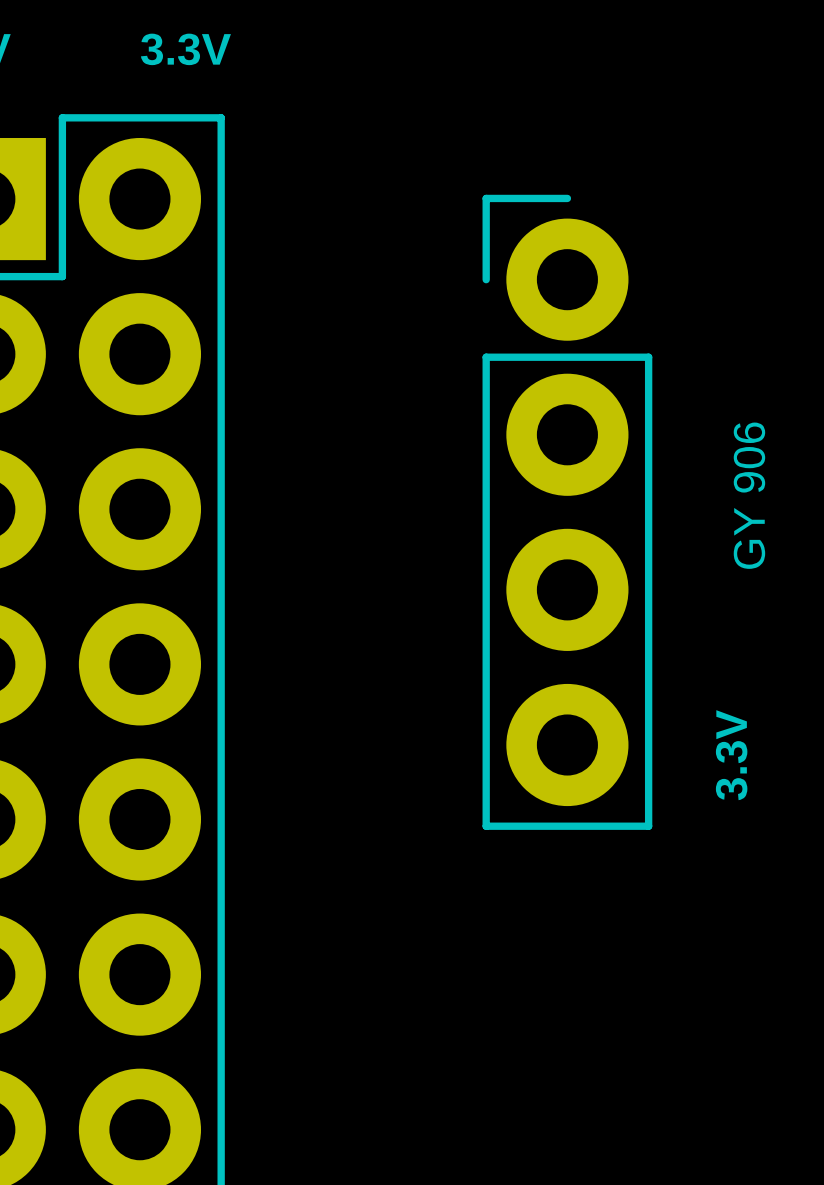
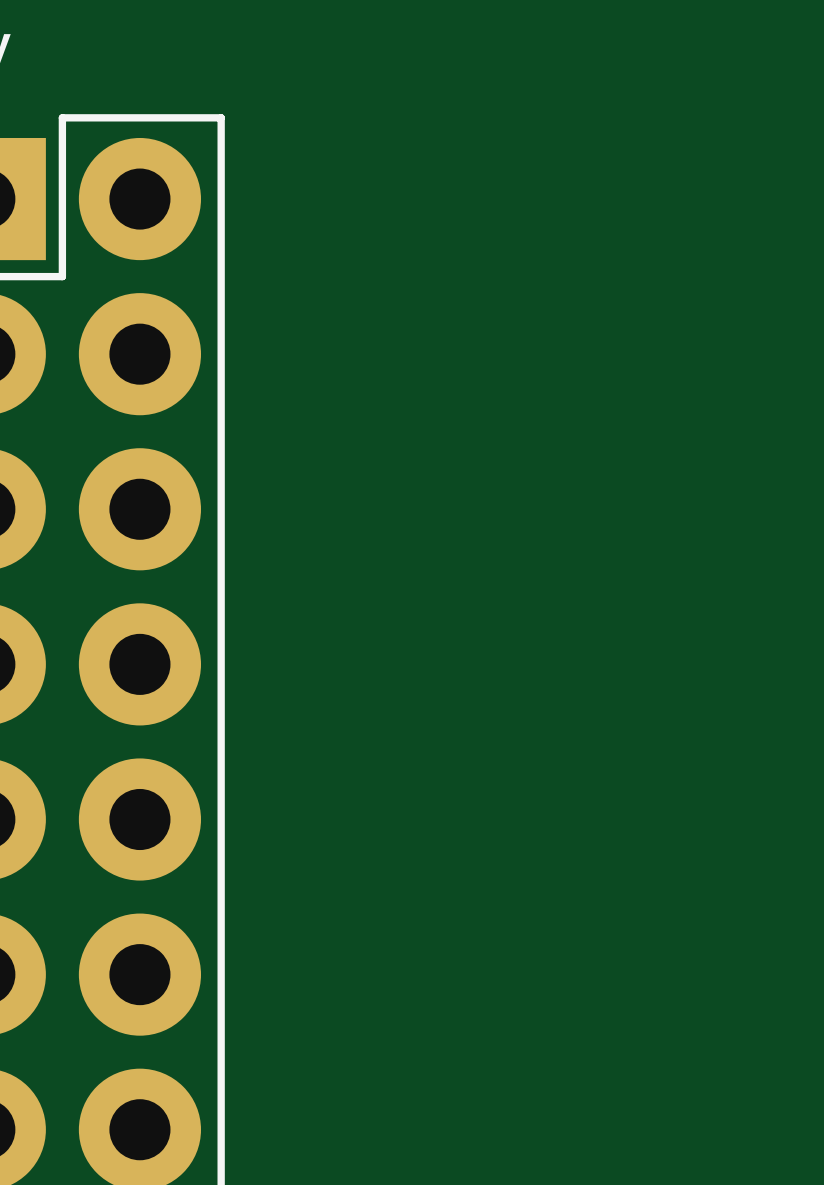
text: 3.3V (185, 49) -> none
text: GY 906 (749, 495) -> none
part: (567, 512) -> none
text: 3.3V (731, 755) -> none

